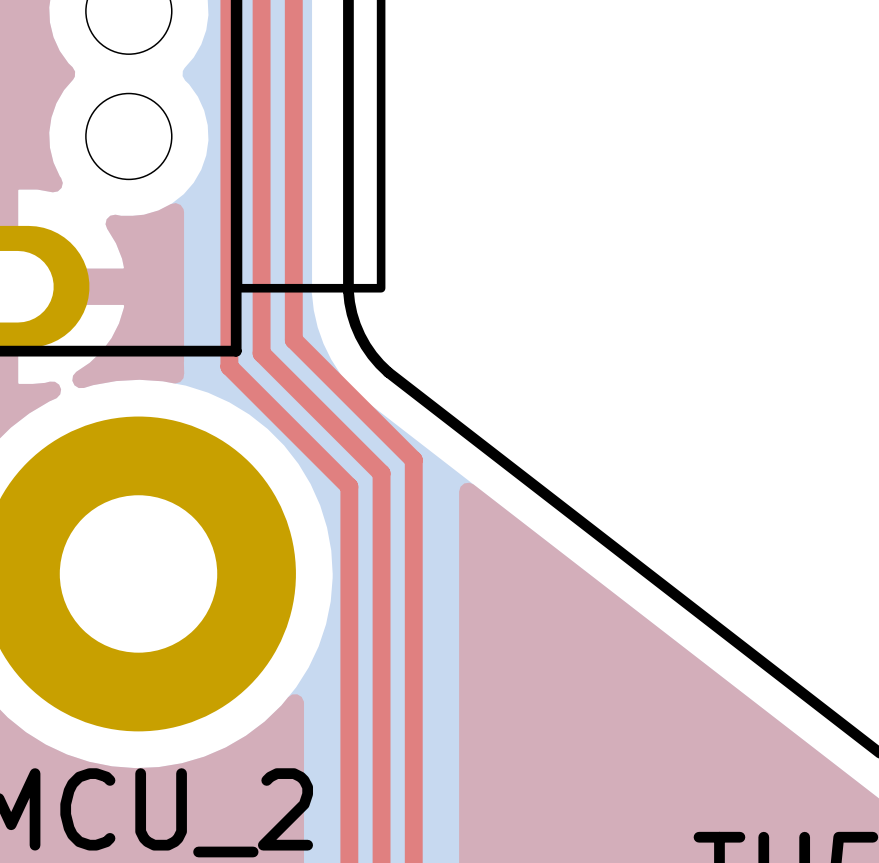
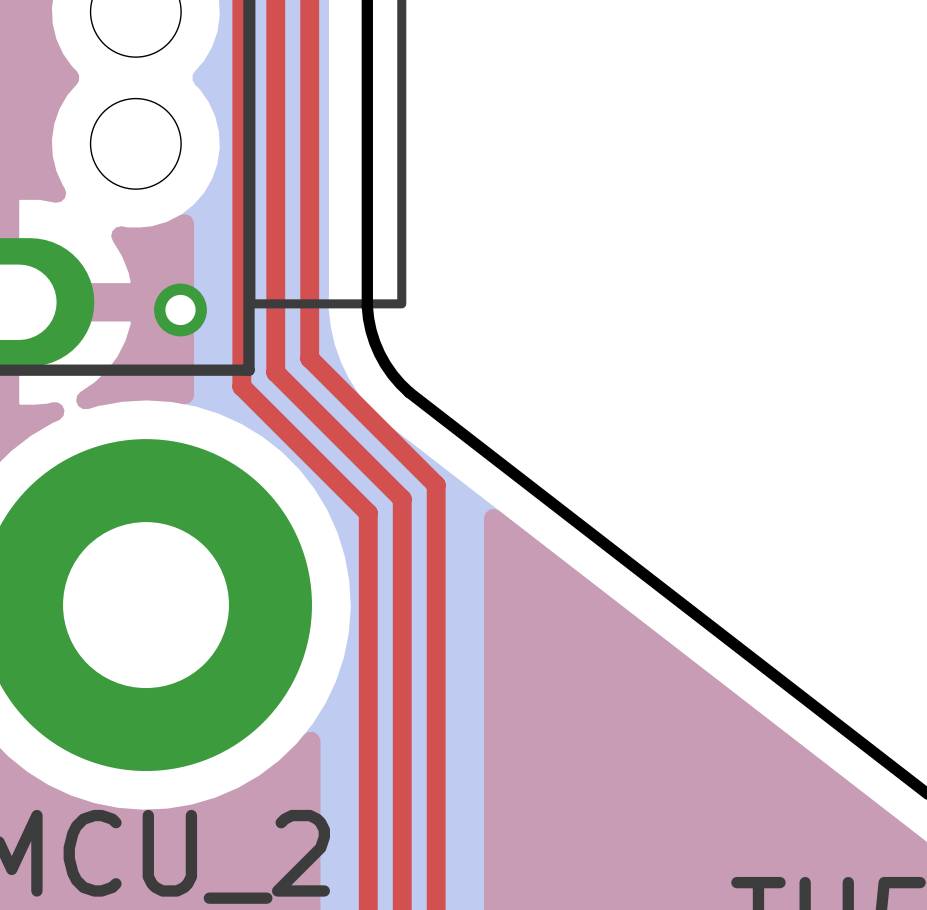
via: none -> (180, 309)

